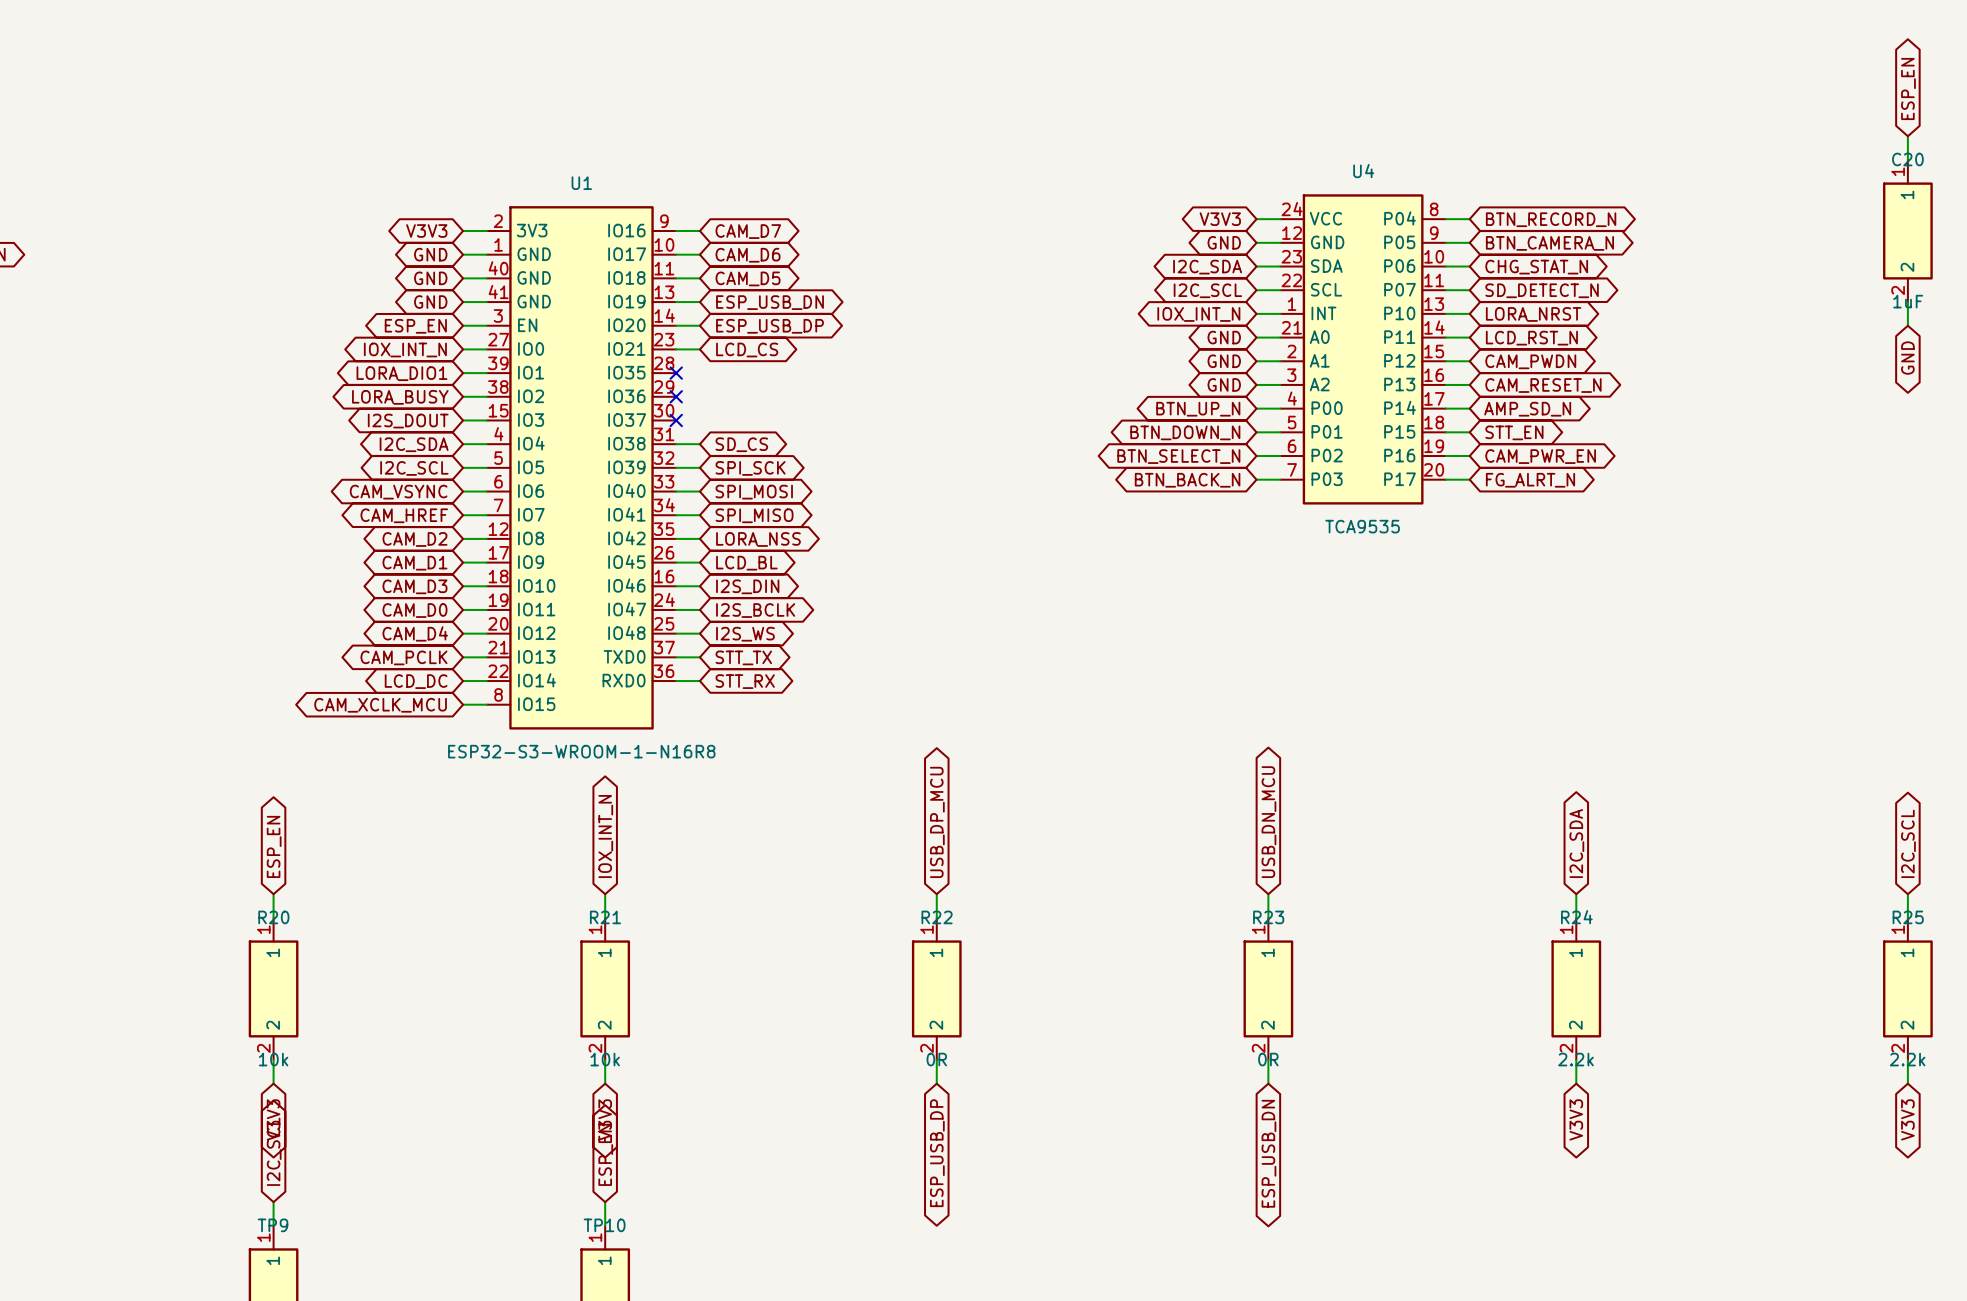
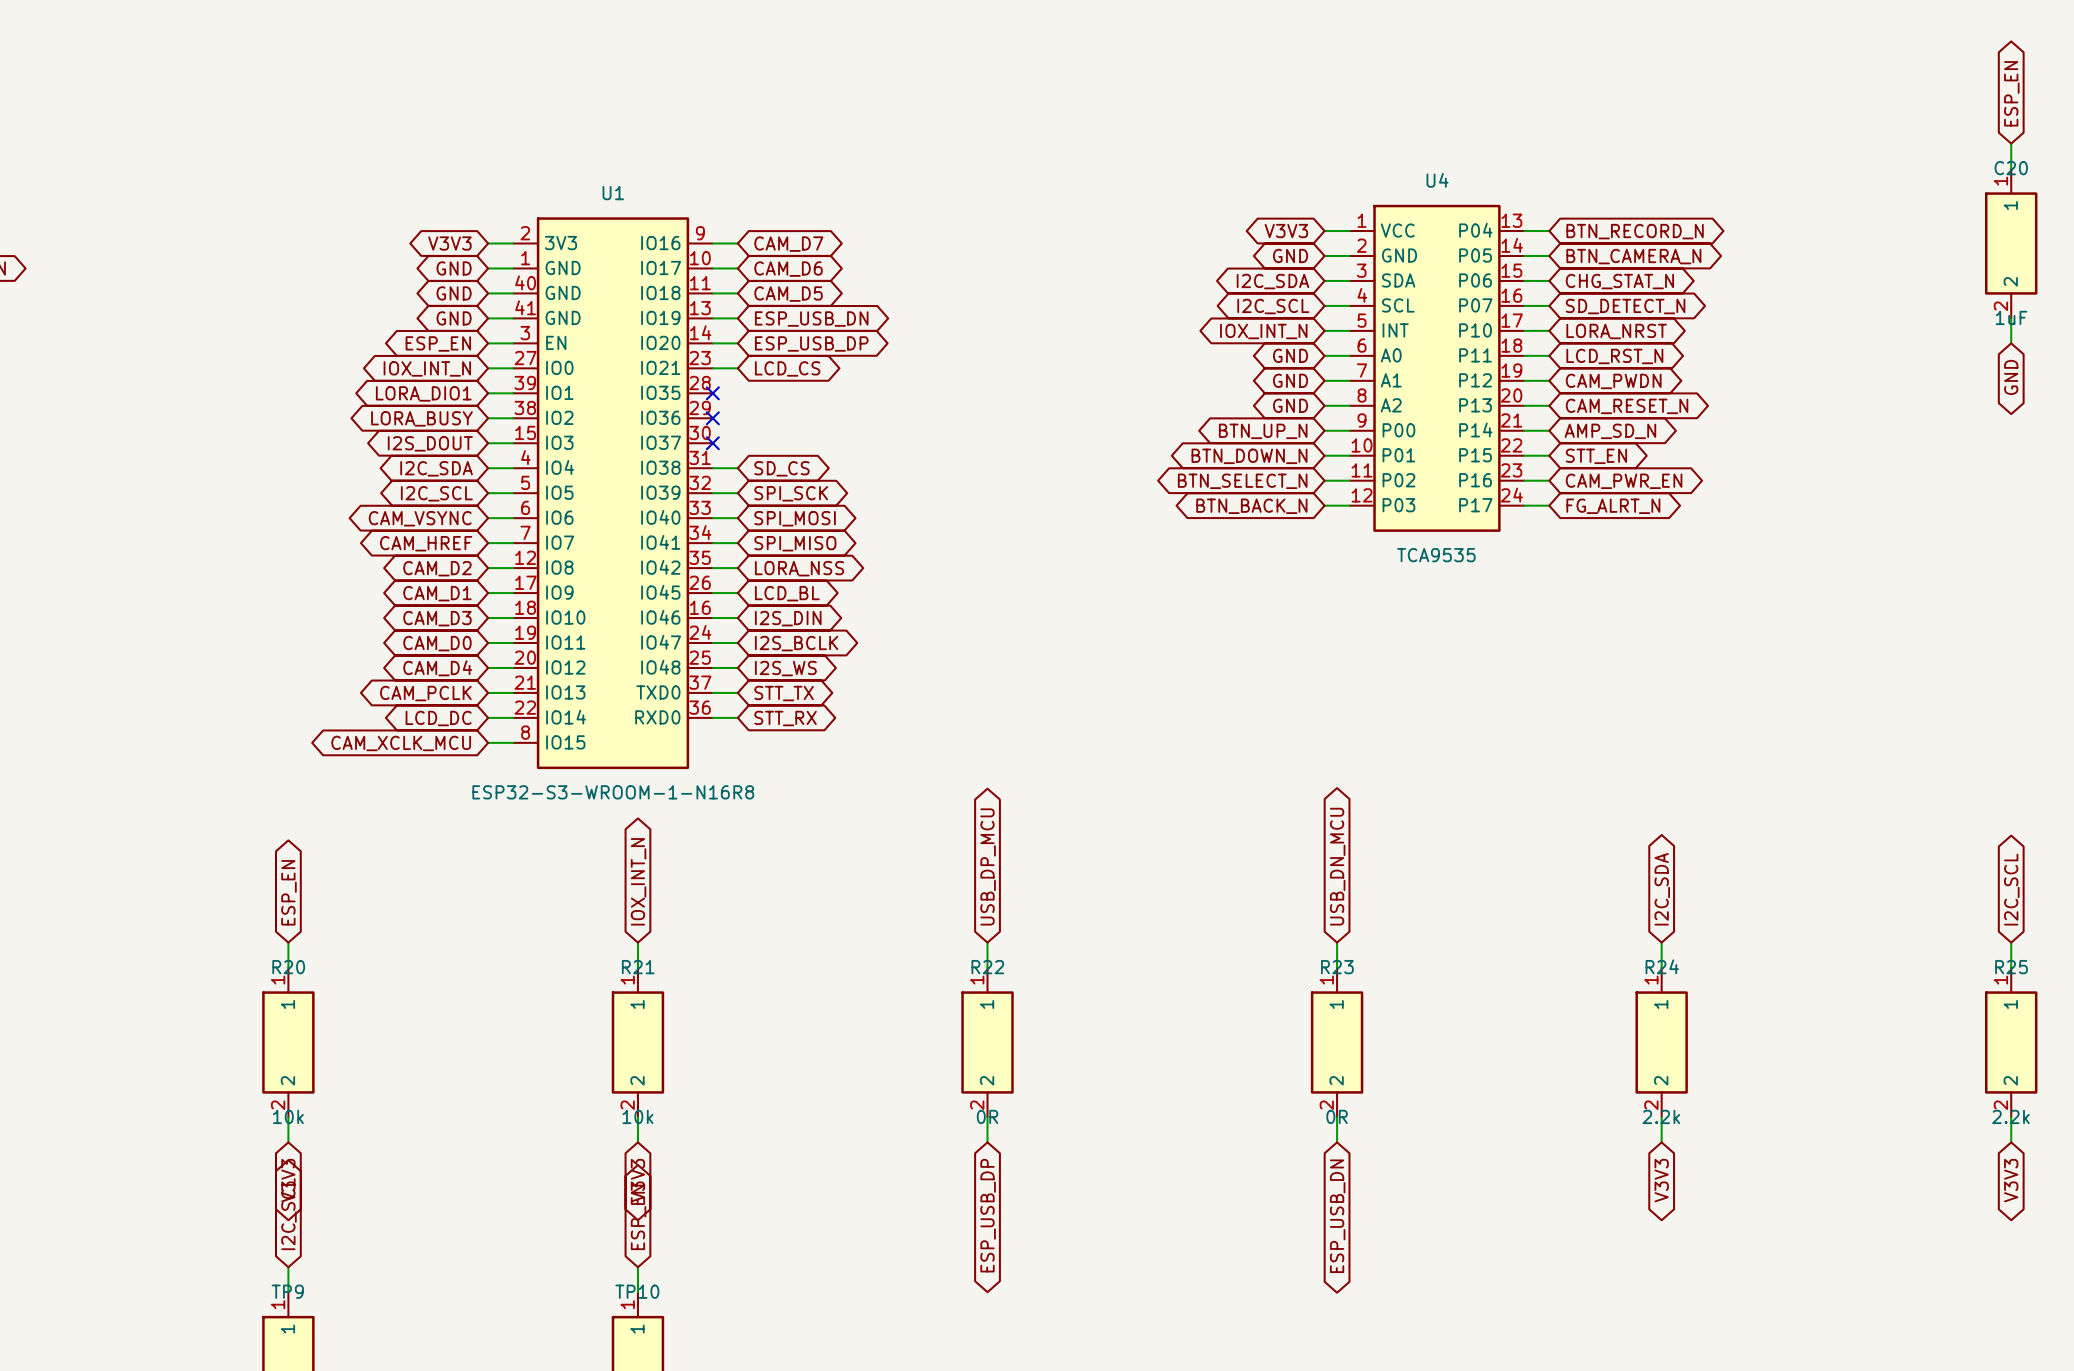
U4 symbol: [1280, 194, 1447, 505] -> [1349, 204, 1525, 532]

